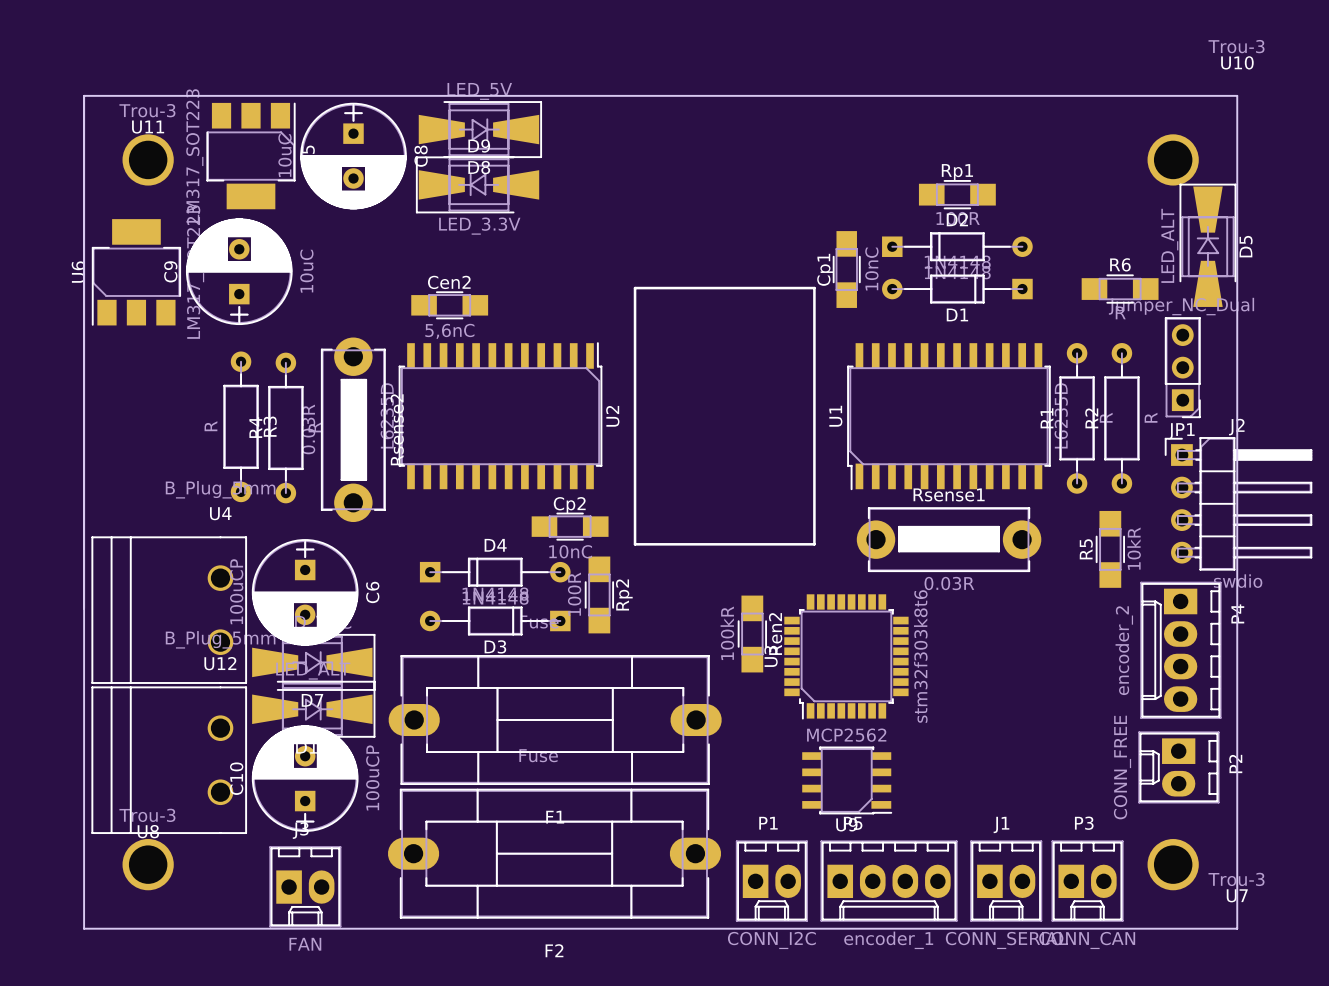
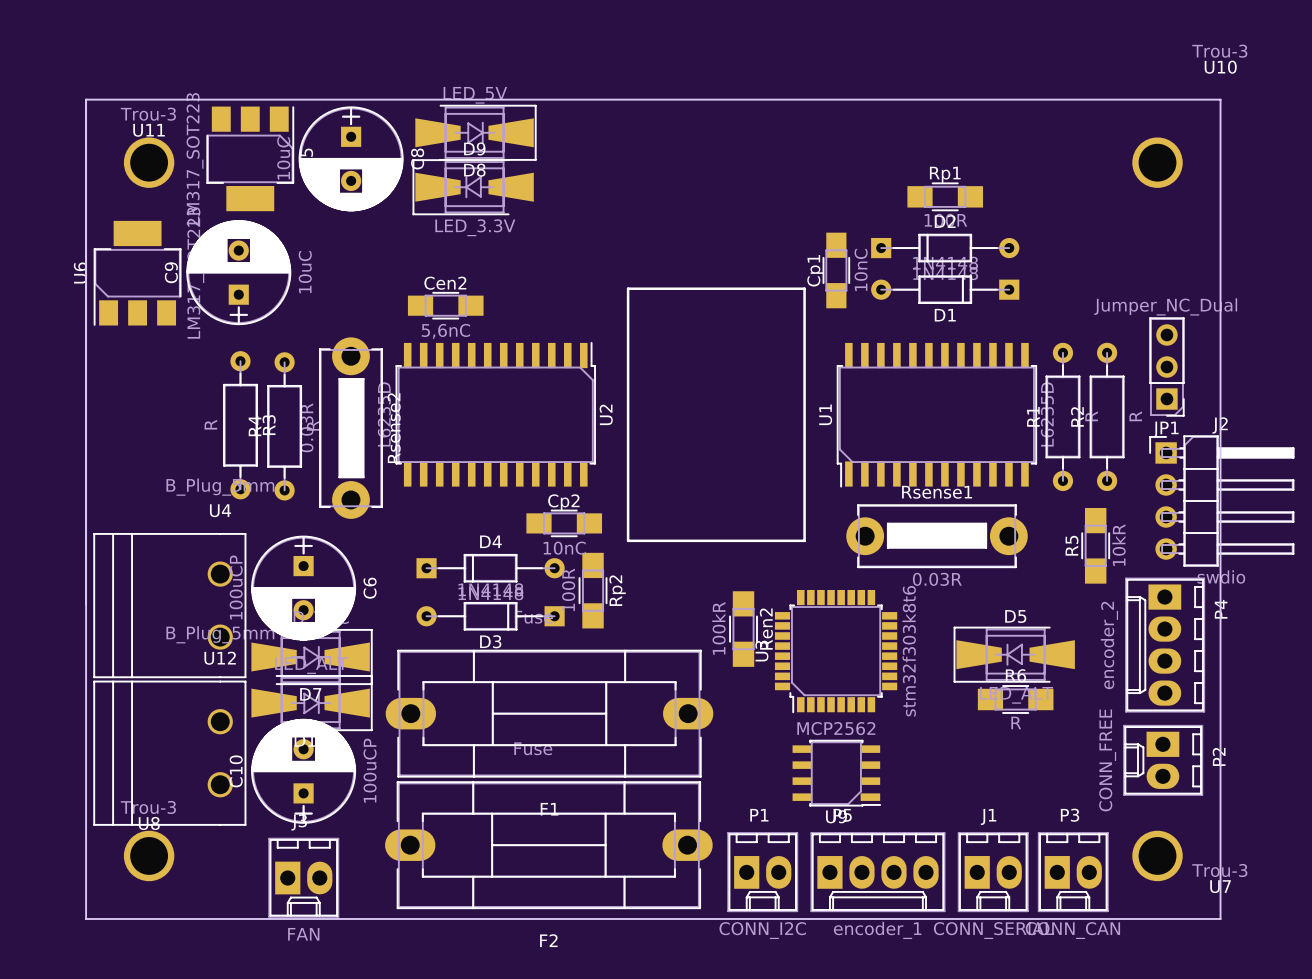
D5 rotation: 0° (1207, 245) -> 90° counterclockwise (1014, 654)
D5 position: (1207, 245) -> (1014, 654)
R6 position: (1120, 289) -> (1015, 699)

